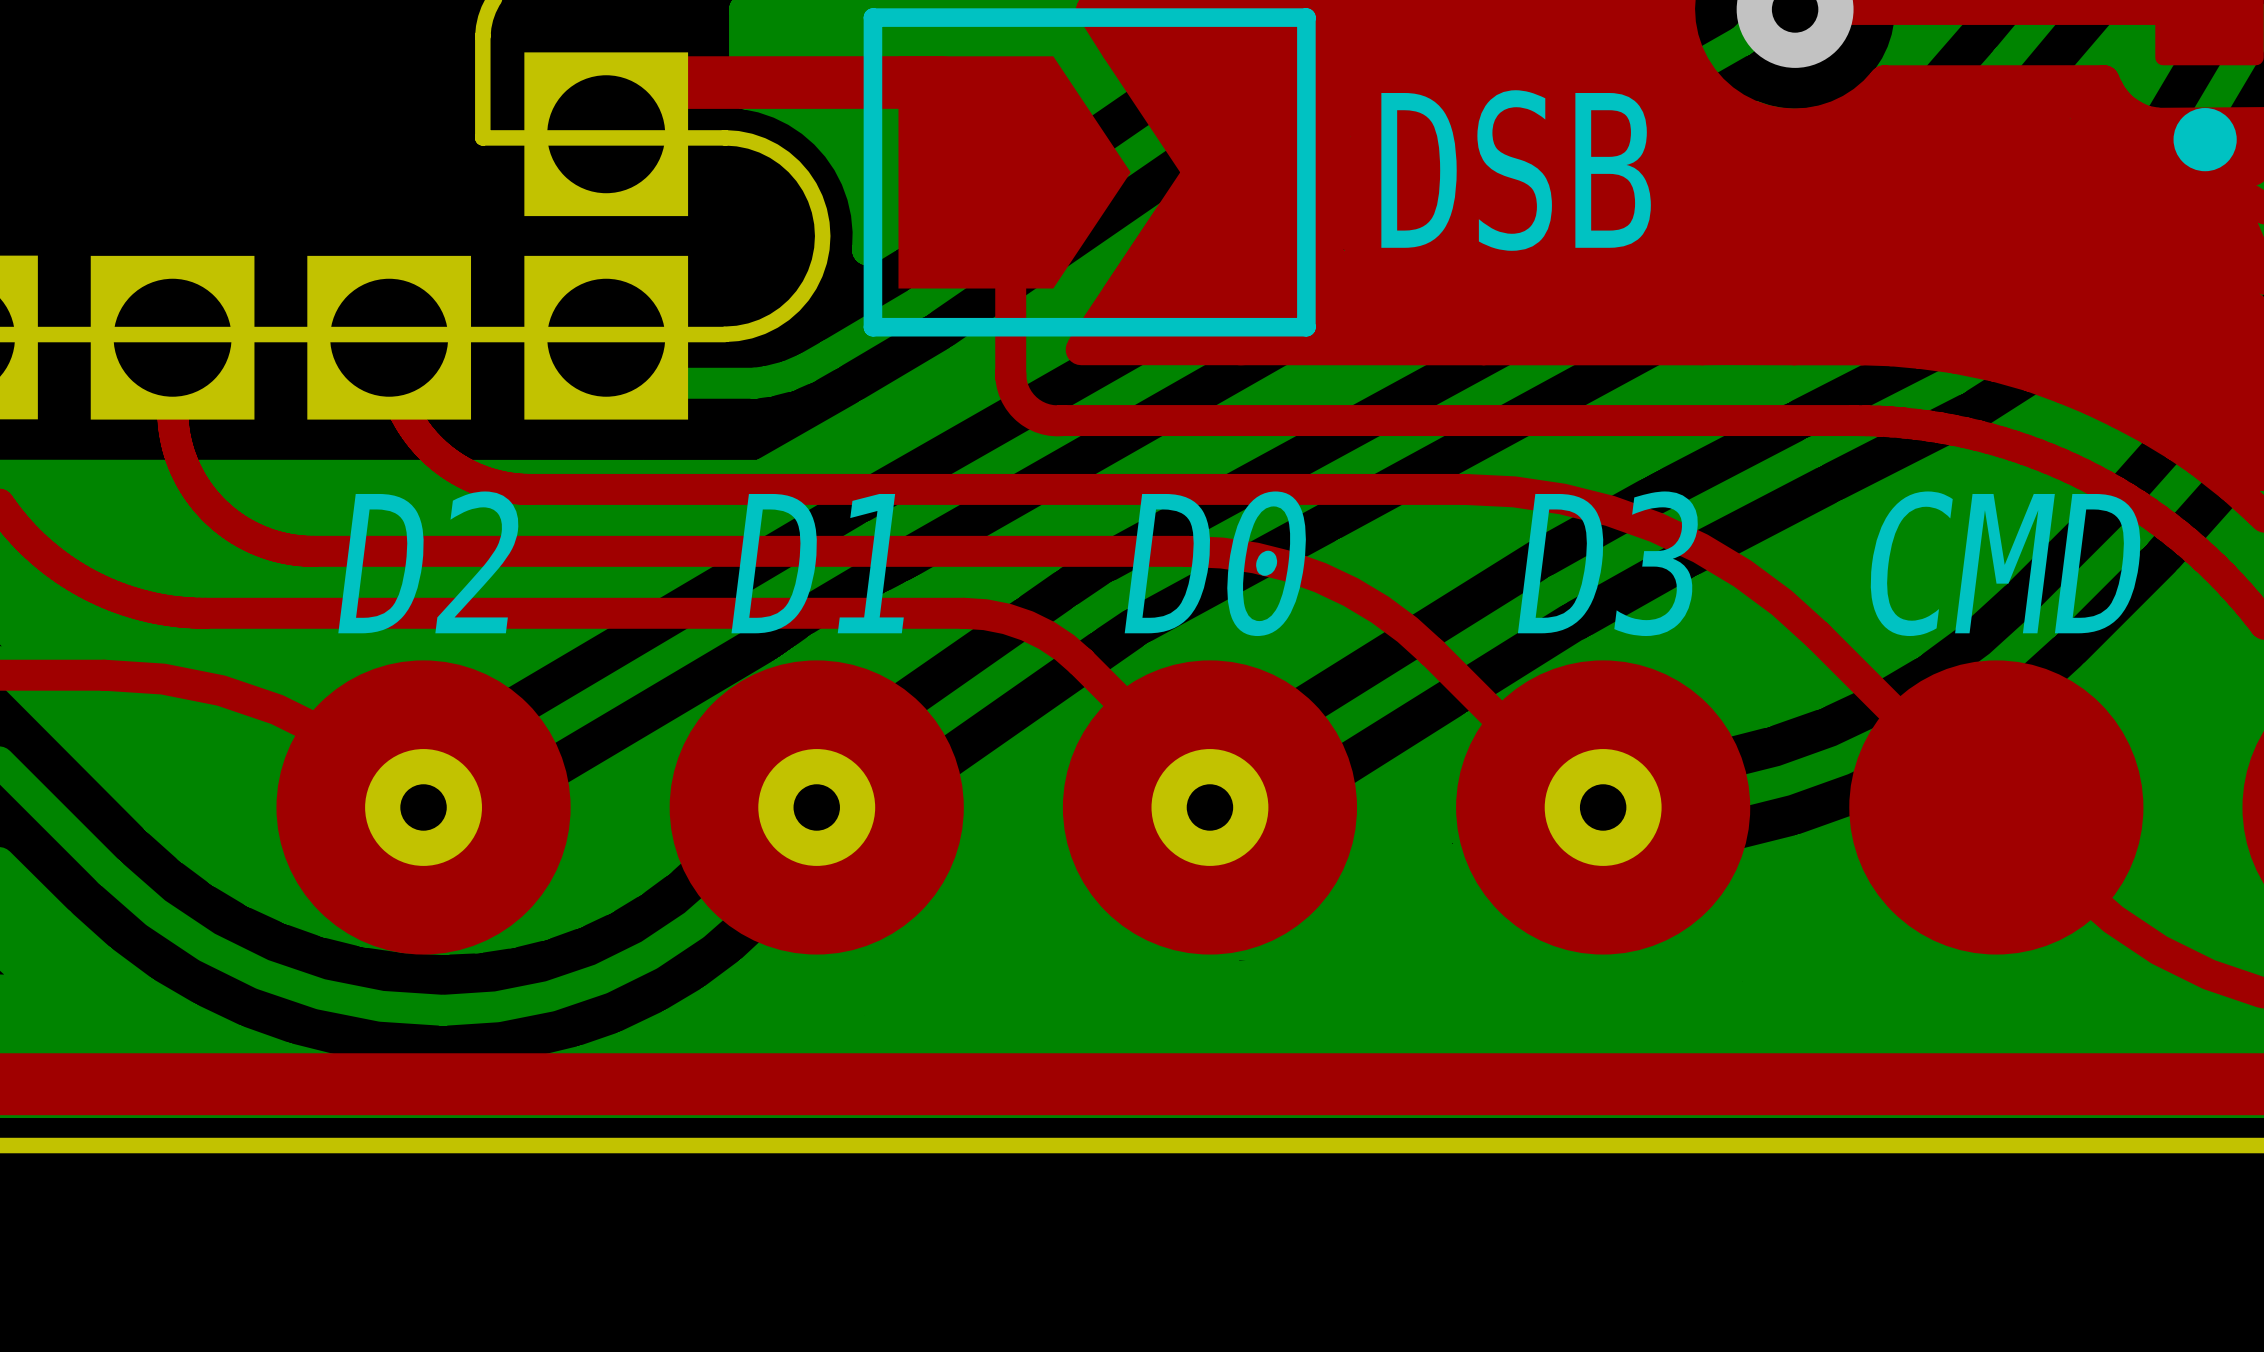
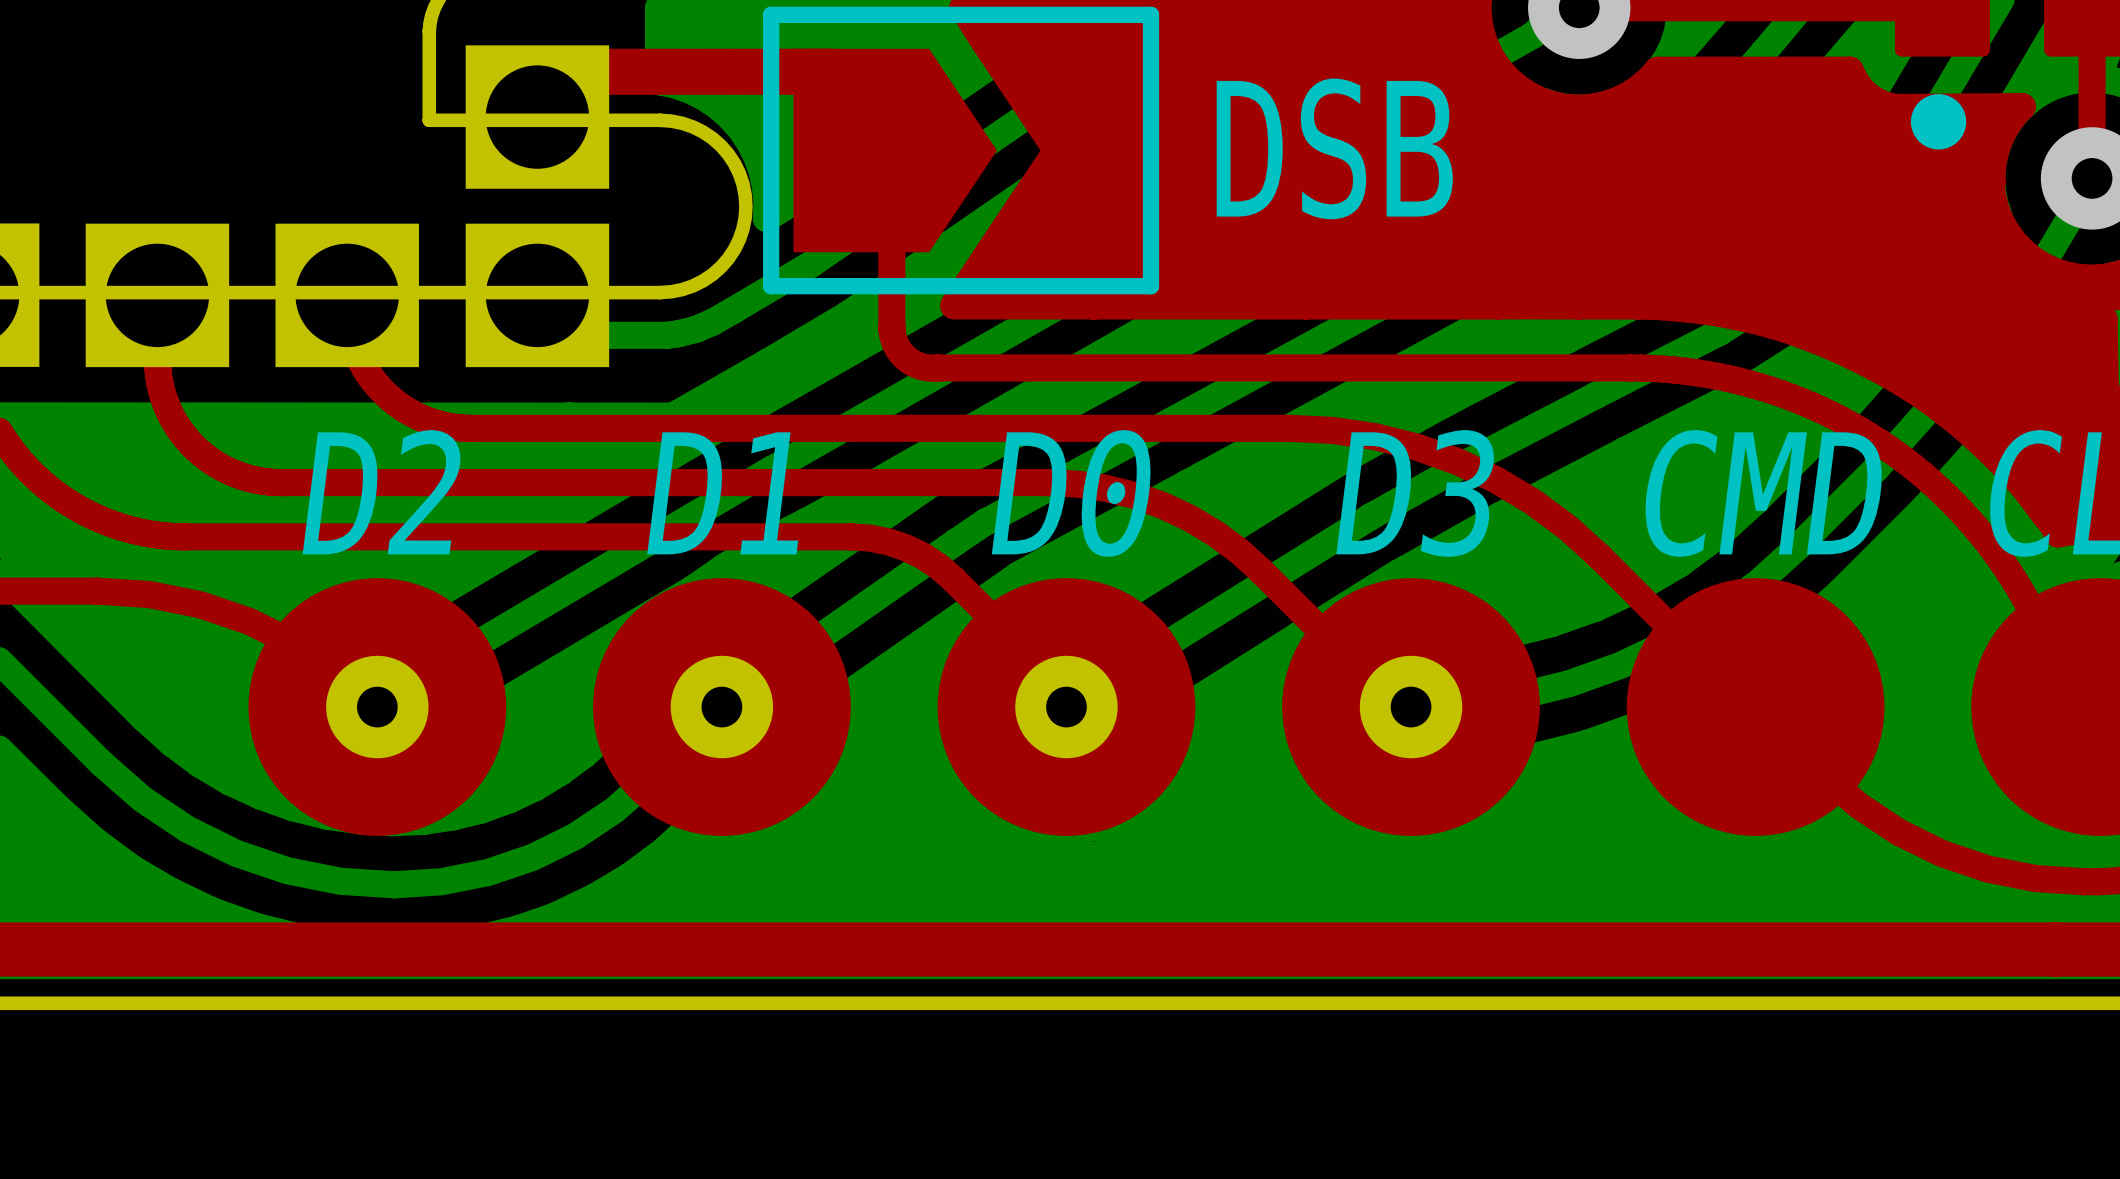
board edge: (724, 137) (750, 141) (762, 145) (784, 158) (794, 166) (802, 176) (815, 198) (821, 223) (822, 236) (819, 261) (815, 273) (802, 295) (794, 305) (773, 321) (762, 326) (737, 333) (724, 334) -> (641, 120) (682, 123) (712, 138) (728, 154) (739, 173) (745, 206) (743, 228) (734, 249) (712, 274) (682, 289) (641, 292)

